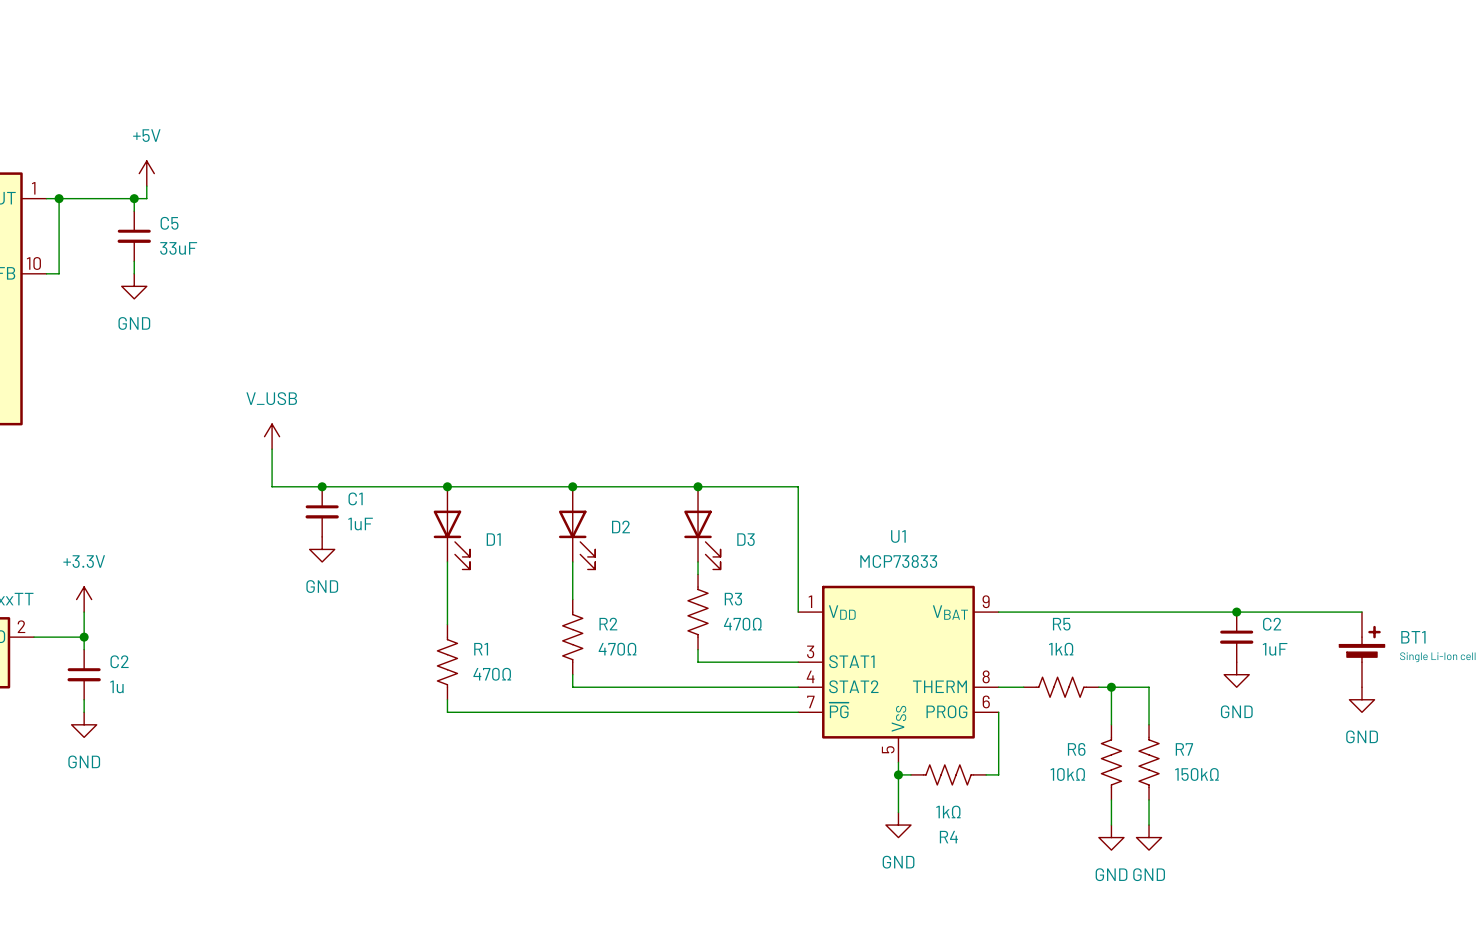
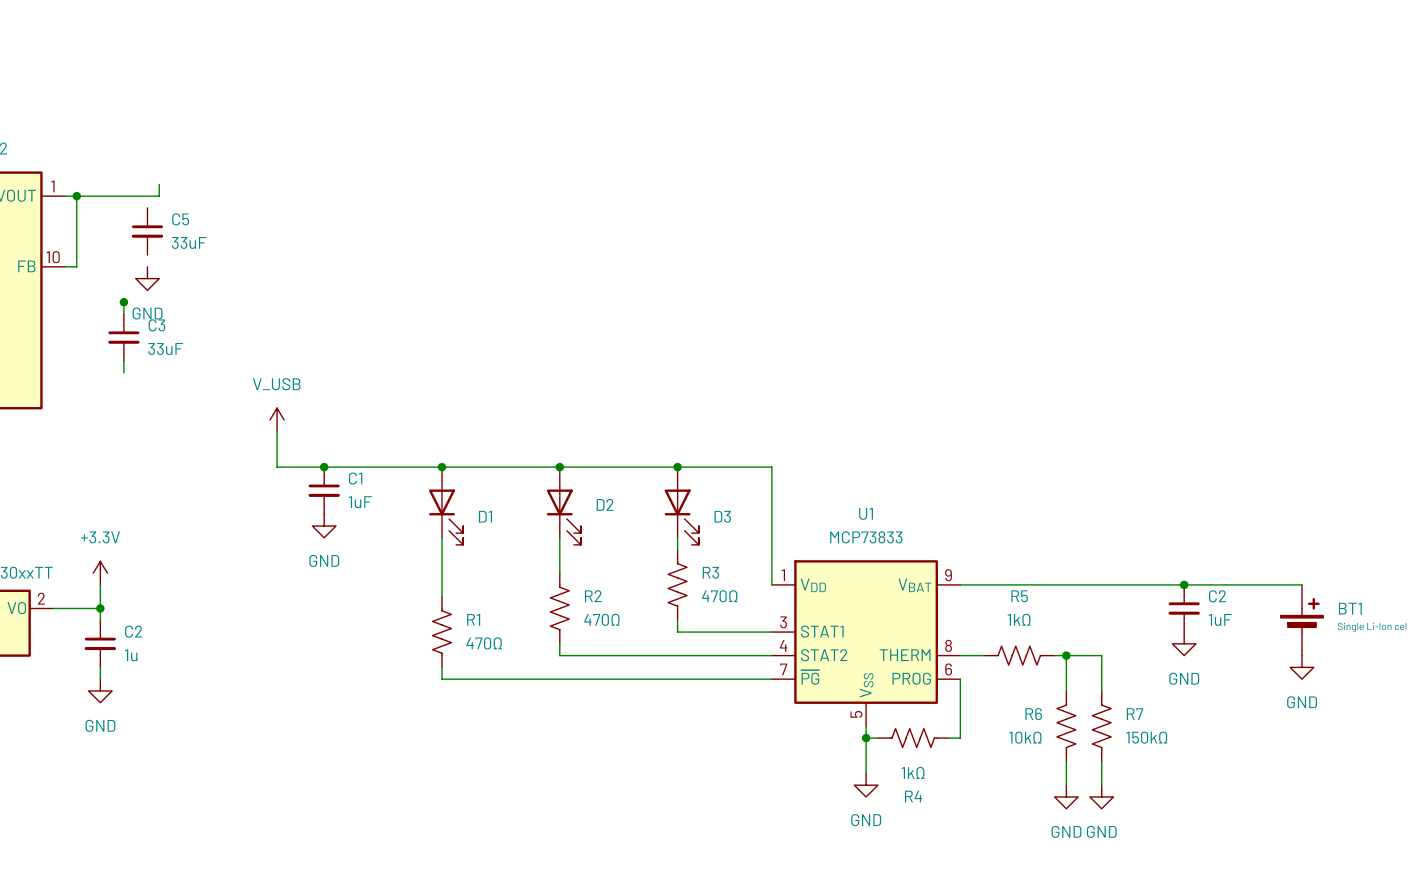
power symbol: +5V (146, 173) -> none
wire: (134, 198) (134, 211) -> (123, 302) (123, 313)
junction: (134, 198) -> none
wire: (134, 261) (134, 273) -> (123, 361) (123, 372)
junction: none -> (123, 302)
C3: none -> 33uF (123, 337)

